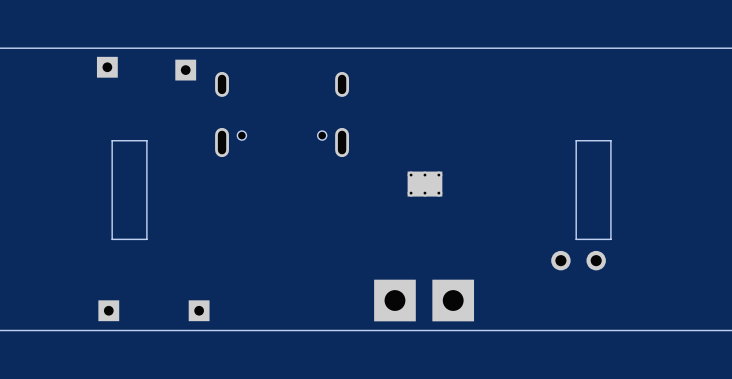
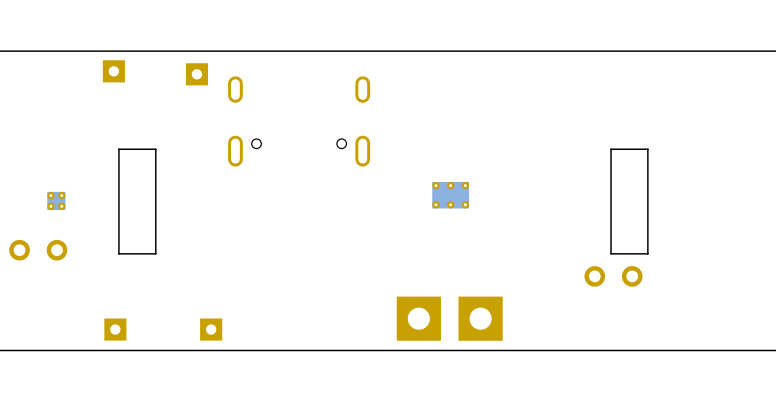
part: none -> (56, 200)
part: none -> (38, 250)

